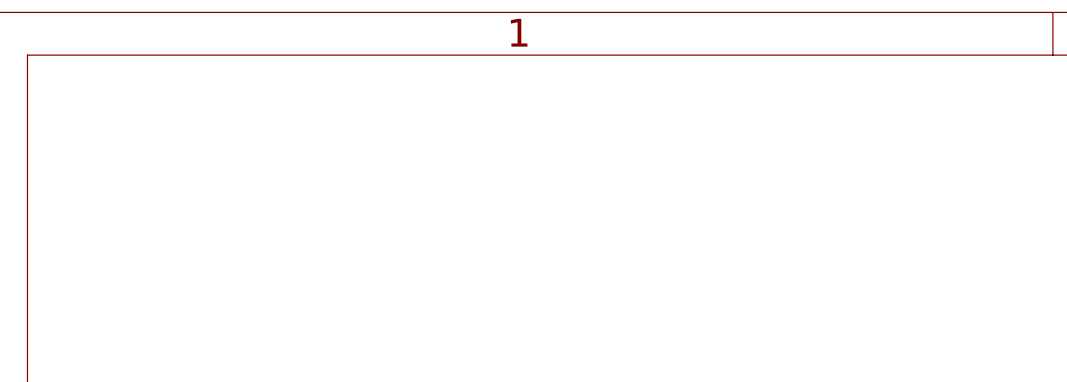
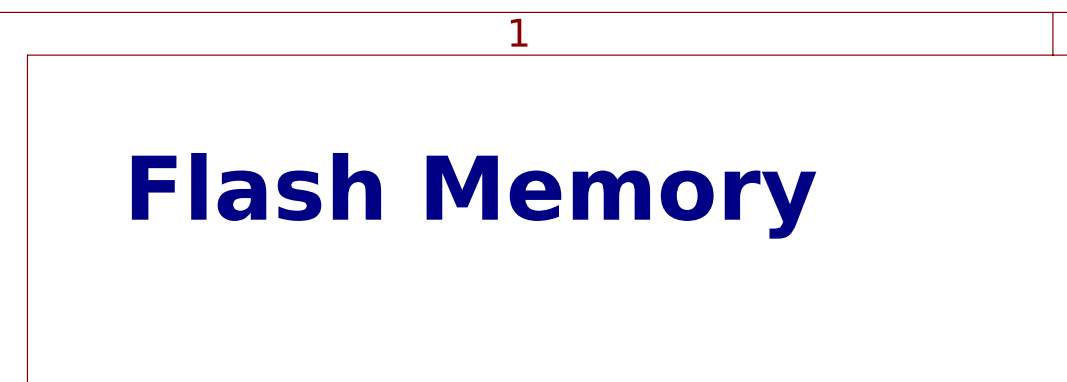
text: none -> Flash Memory (474, 195)

